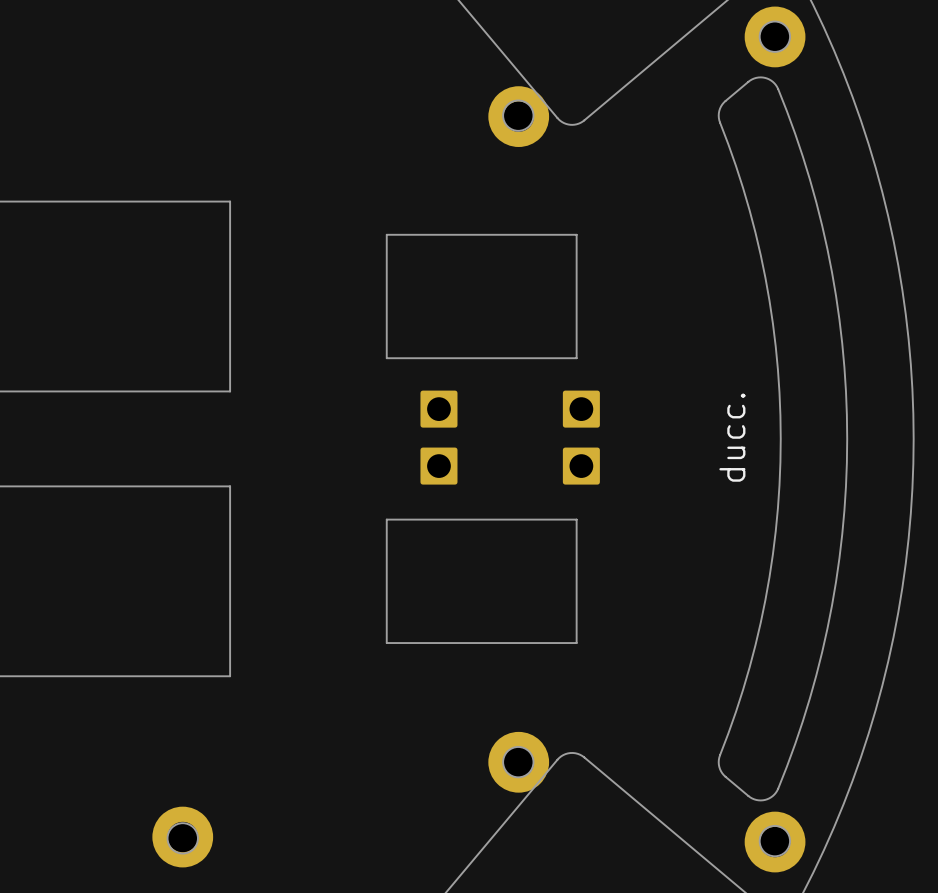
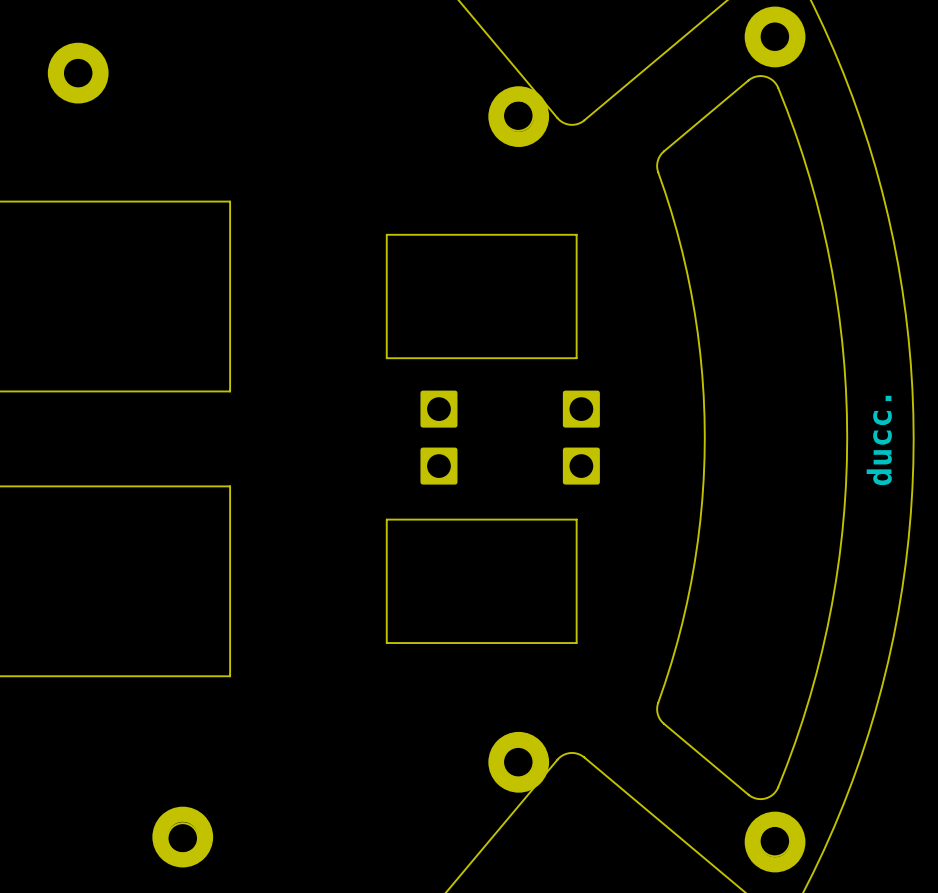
round board edge: none -> [62, 56, 95, 90]
part: none -> (78, 73)
board edge: (748, 81) (722, 104) (718, 118) (749, 210) (769, 300) (779, 392) (779, 485) (772, 554) (760, 622) (743, 689) (718, 762) (720, 769) (725, 776) (750, 797) (760, 800) (769, 798) (776, 792) (787, 766) (809, 698) (827, 628) (836, 581) (844, 510) (846, 414) (842, 343) (836, 295) (822, 225) (809, 179) (777, 87) (771, 80) (762, 77) (756, 77) (748, 81) -> (748, 80) (756, 76) (765, 76) (771, 79) (777, 85) (809, 178) (827, 247) (836, 294) (842, 342) (846, 413) (844, 509) (839, 556) (827, 627) (809, 697) (787, 765) (776, 791) (769, 797) (760, 799) (748, 794) (663, 723) (658, 716) (657, 709) (682, 623) (694, 561) (702, 499) (704, 437) (702, 375) (694, 313) (682, 252) (657, 170) (657, 163) (663, 151) (748, 80)
text position: ducc. (732, 437) -> ducc. (879, 440)

